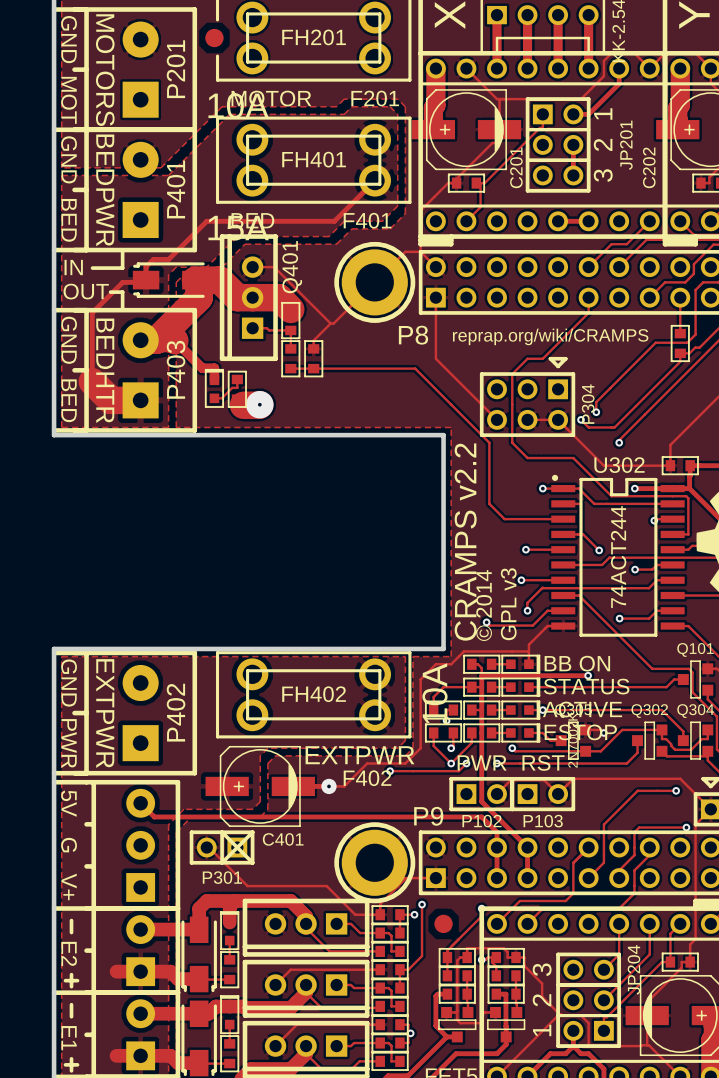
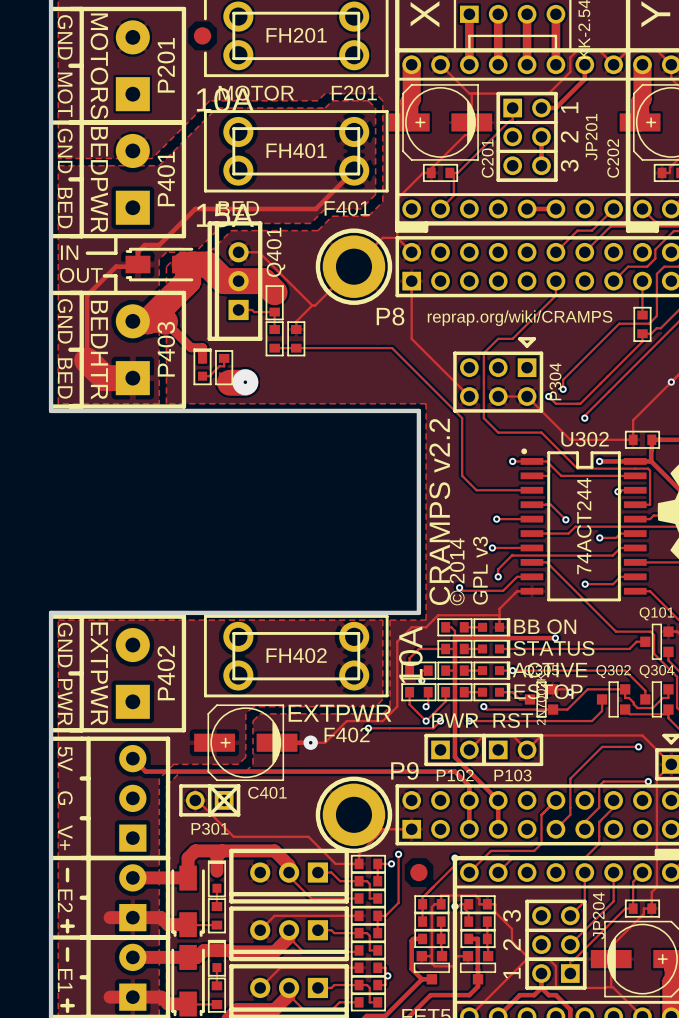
via: none -> (671, 382)

